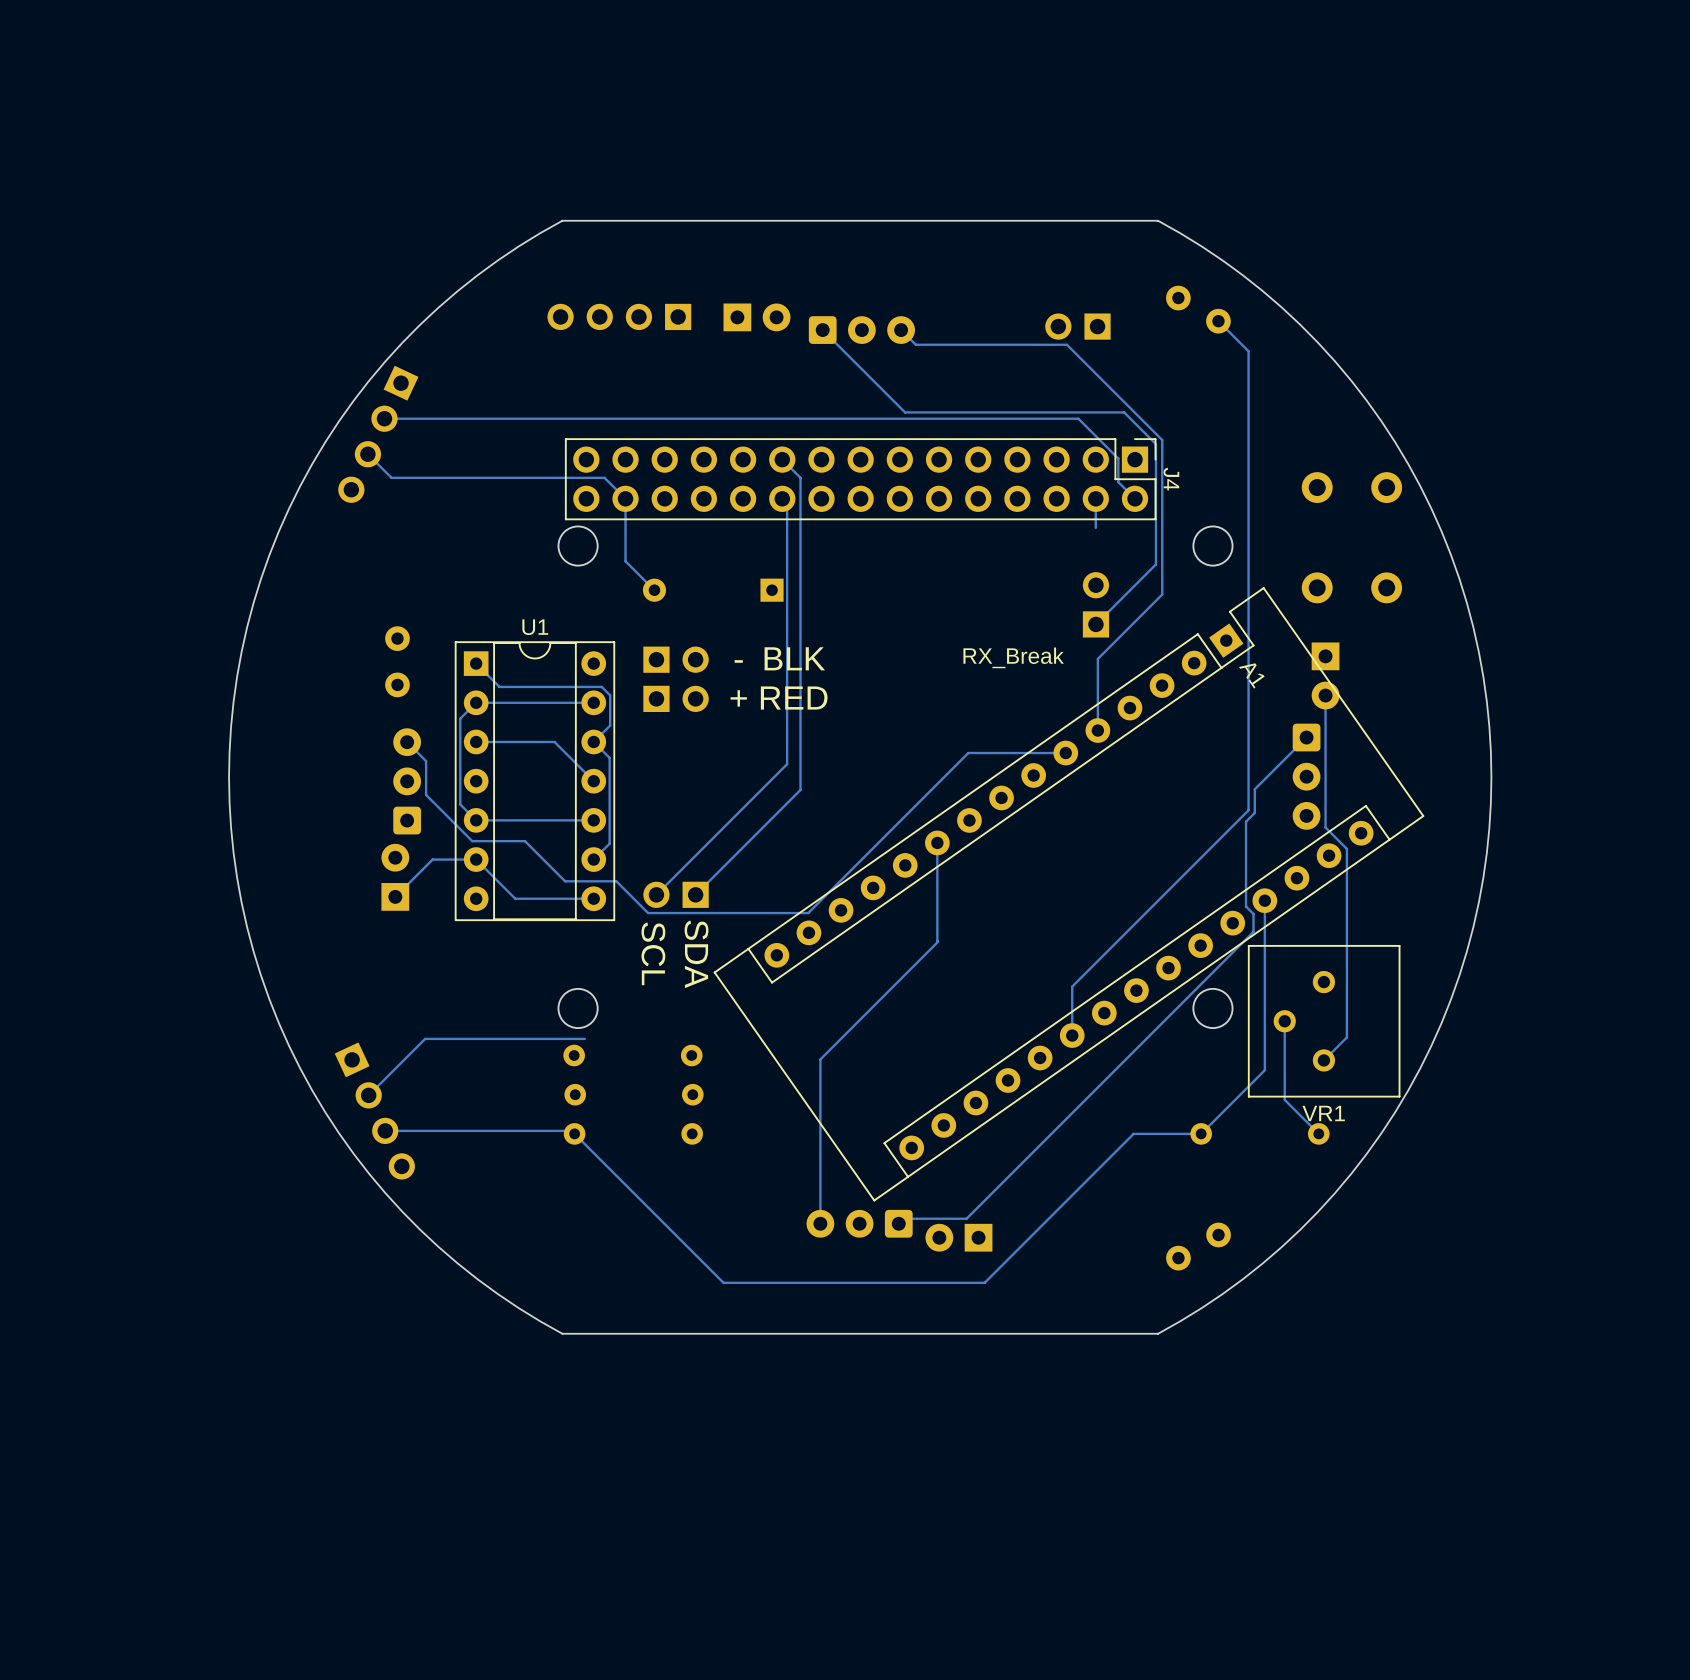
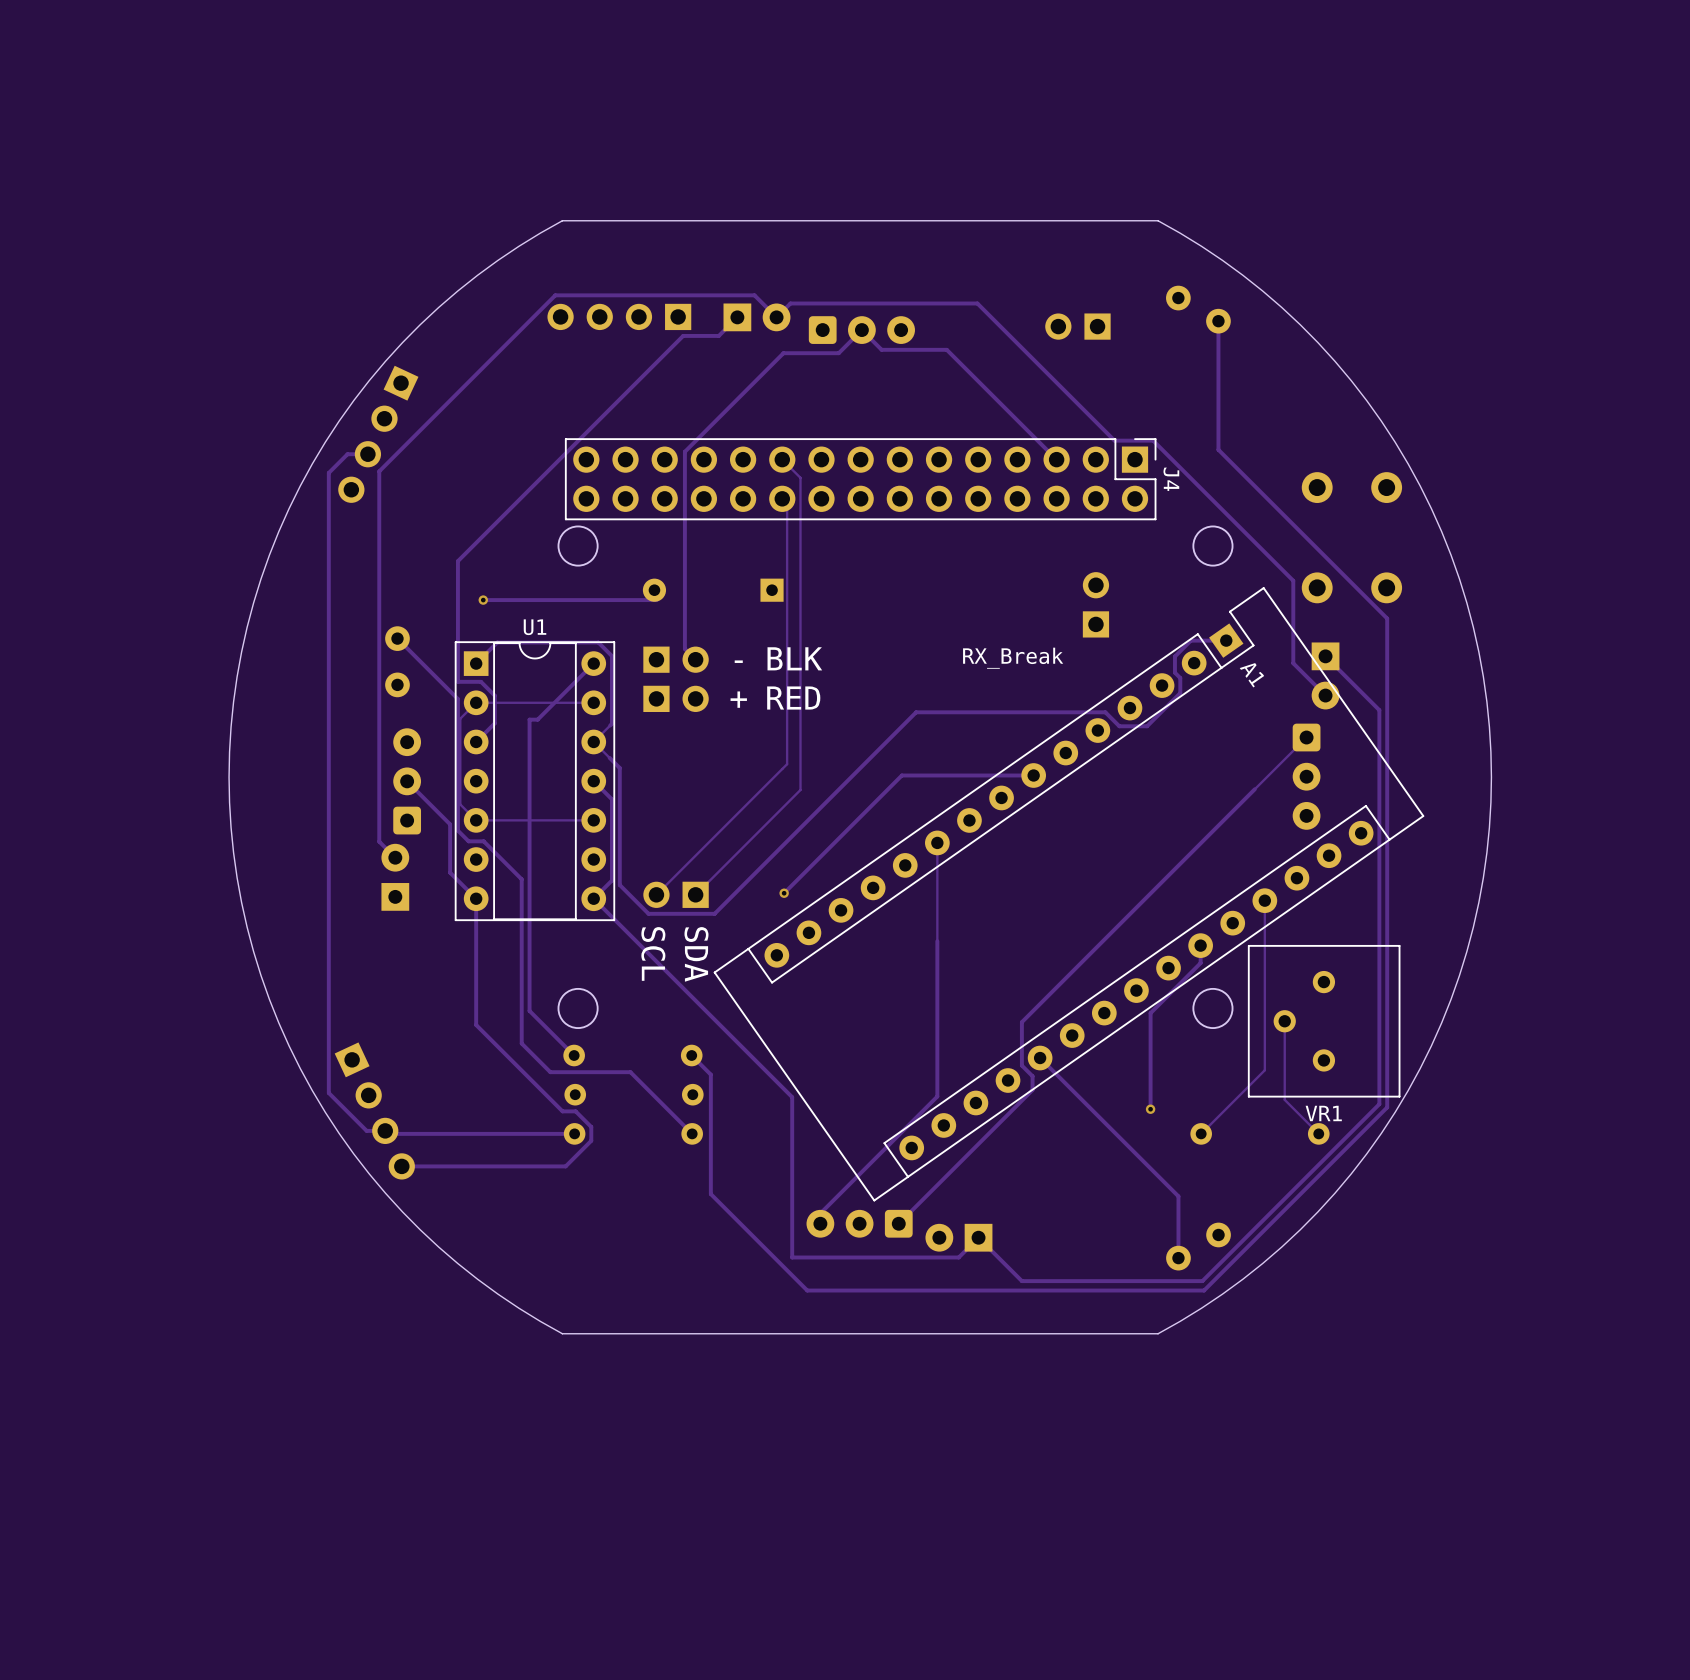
track: (1218, 321) (1248, 351) (1248, 810) (1072, 986) (1072, 1035) -> (1218, 321) (1218, 449) (1387, 618) (1387, 1107) (1204, 1290) (807, 1290) (710, 1194) (710, 1074) (691, 1055)
track: (822, 330) (905, 412) (1124, 412) (1155, 444) (1155, 564) (1095, 624) -> none
track: (901, 330) (915, 344) (1066, 344) (1162, 440) (1162, 594) (1097, 658) (1097, 730) -> none
track: (384, 418) (1078, 418) (1118, 458) (1118, 482) (1135, 498) -> none
track: (367, 454) (391, 477) (604, 477) (625, 498) (625, 561) (654, 590) -> (367, 454) (347, 454) (328, 472) (328, 1093) (366, 1130) (385, 1130) (388, 1133) (574, 1133)
track: none -> (1056, 459) (946, 349) (881, 349) (861, 330) (838, 353) (783, 353) (684, 451) (684, 648) (695, 659)
track: (1095, 498) (1095, 527) -> none
via: none -> (483, 600)
track: none -> (656, 600) (483, 600)
track: none -> (397, 638) (457, 699) (457, 830) (468, 841) (483, 841) (521, 879) (521, 1043) (550, 1072) (630, 1072) (692, 1133)
track: none -> (1325, 656) (1379, 710) (1379, 1104) (1202, 1281) (1021, 1281) (978, 1237) (958, 1257) (792, 1257) (792, 1097) (593, 898) (611, 880) (611, 799) (593, 781)
track: (476, 663) (499, 686) (601, 686) (610, 695) (610, 725) -> (476, 663) (497, 642) (598, 642) (611, 656) (611, 723) (610, 725)
track: none -> (593, 663) (537, 719) (529, 719) (529, 1010) (574, 1055)
track: (1325, 695) (1325, 827) (1346, 848) (1346, 1037) (1323, 1060) -> (1325, 695) (1293, 663) (1293, 580) (1153, 440) (1114, 440) (977, 303) (790, 303) (776, 317) (754, 295) (555, 295) (379, 471) (379, 841) (395, 857)
track: (476, 741) (554, 741) (593, 781) -> (476, 741) (494, 723) (494, 695) (480, 681) (457, 681) (457, 561) (683, 335) (718, 335) (737, 317)
track: (407, 742) (426, 761) (426, 794) (472, 841) (524, 841) (565, 881) (616, 881) (648, 913) (808, 913) (968, 753) (1065, 753) -> none
track: (609, 757) (609, 843) (593, 859) -> (609, 757) (619, 768) (619, 885) (648, 913) (714, 913) (916, 712) (1105, 712) (1119, 726) (1147, 726) (1180, 693) (1180, 678) (1174, 672) (1174, 656) (1190, 640) (1226, 640)
track: none -> (1033, 775) (901, 775) (784, 893)
track: none -> (407, 781) (450, 824) (450, 872) (476, 898) (476, 1024) (562, 1111) (575, 1111) (591, 1126) (591, 1140) (565, 1166) (401, 1166)
track: (1254, 789) (1254, 812) (1246, 821) (1246, 906) (1253, 914) (1253, 931) (966, 1218) (903, 1218) -> (1254, 789) (1021, 1022) (1021, 1065) (1032, 1076) (1032, 1089) (903, 1218)
via: none -> (784, 893)
track: (395, 896) (432, 859) (476, 859) (515, 898) (593, 898) -> none
track: (937, 941) (820, 1059) (820, 1213) -> (937, 941) (937, 1096) (820, 1213)
track: none -> (1200, 945) (1200, 963) (1150, 1013) (1150, 1109)
track: (584, 1038) (425, 1038) (368, 1095) -> none
track: none -> (1040, 1058) (1178, 1196) (1178, 1258)
via: none -> (1150, 1109)
track: (385, 1130) (571, 1130) (723, 1282) (984, 1282) (1133, 1133) (1201, 1133) -> none

